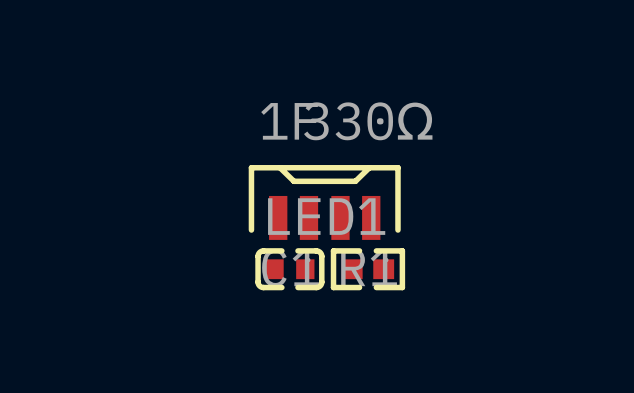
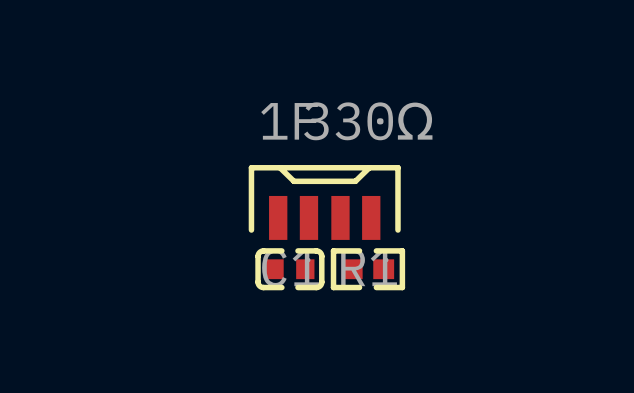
LED1 name: LED1 (326, 216) -> none

